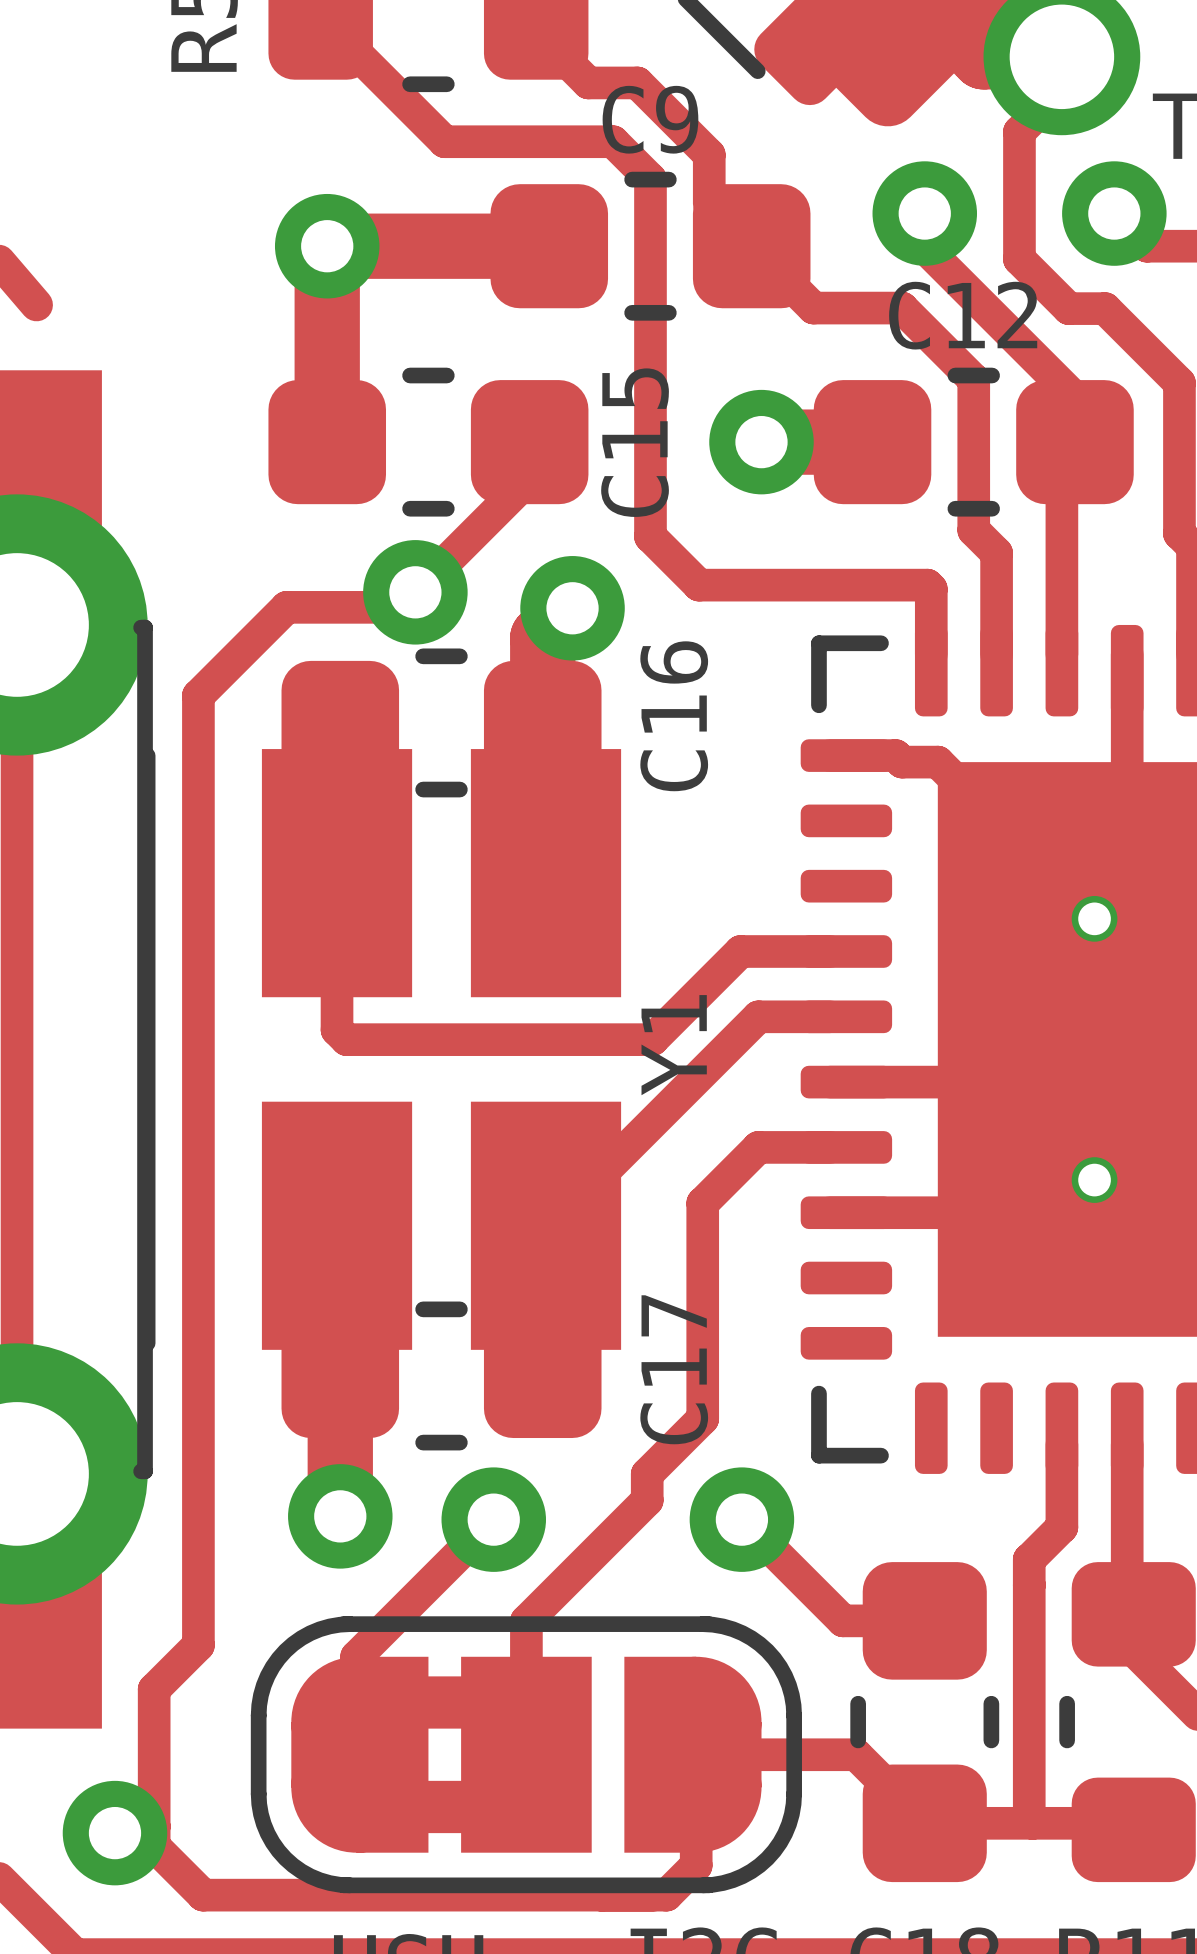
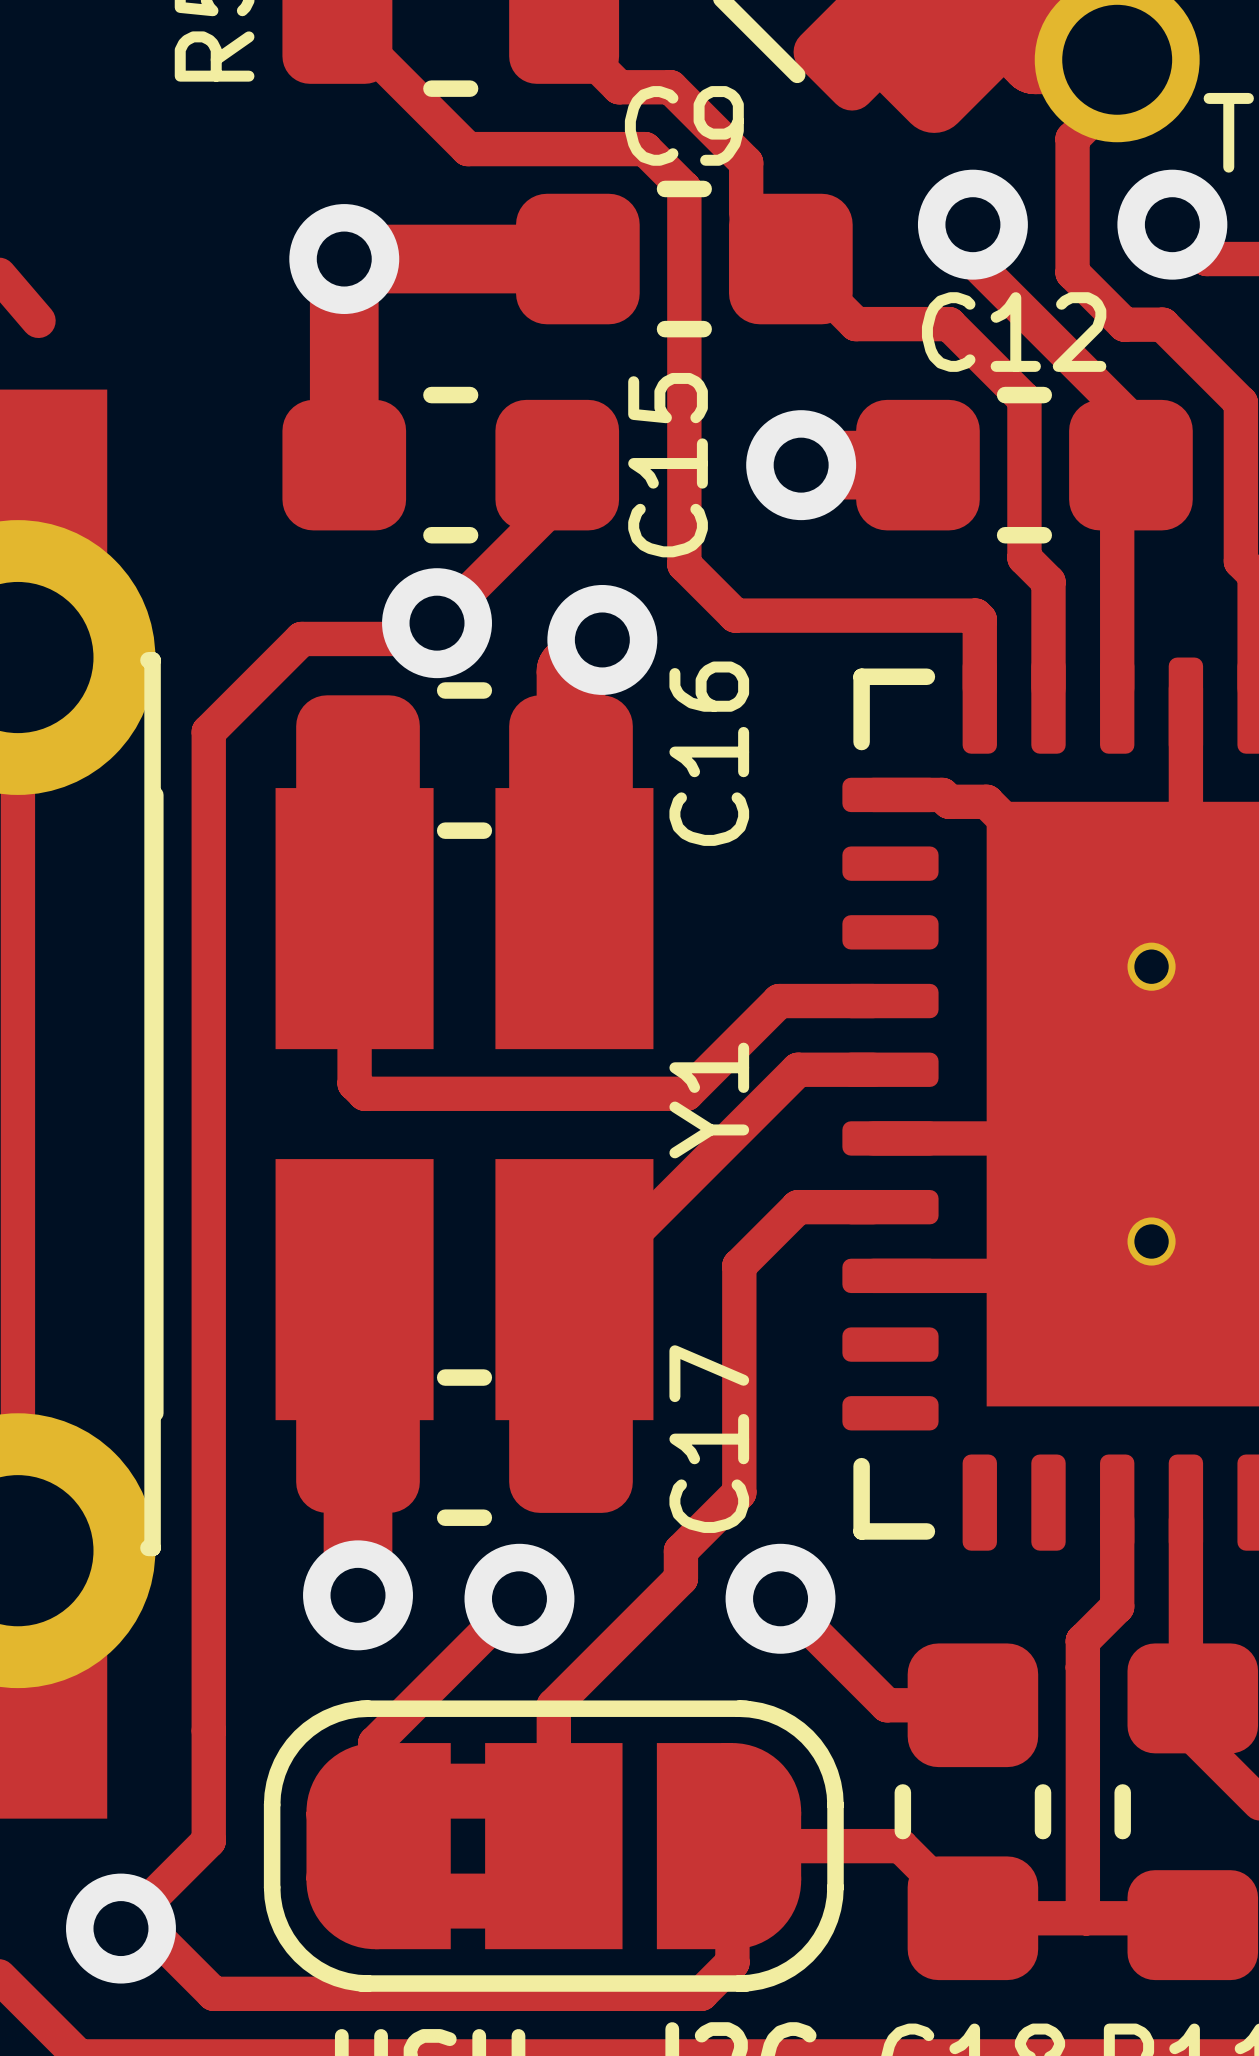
track: (198, 1645) (154, 1689) (154, 1846) -> (208, 1730) (208, 1840) (120, 1928)

